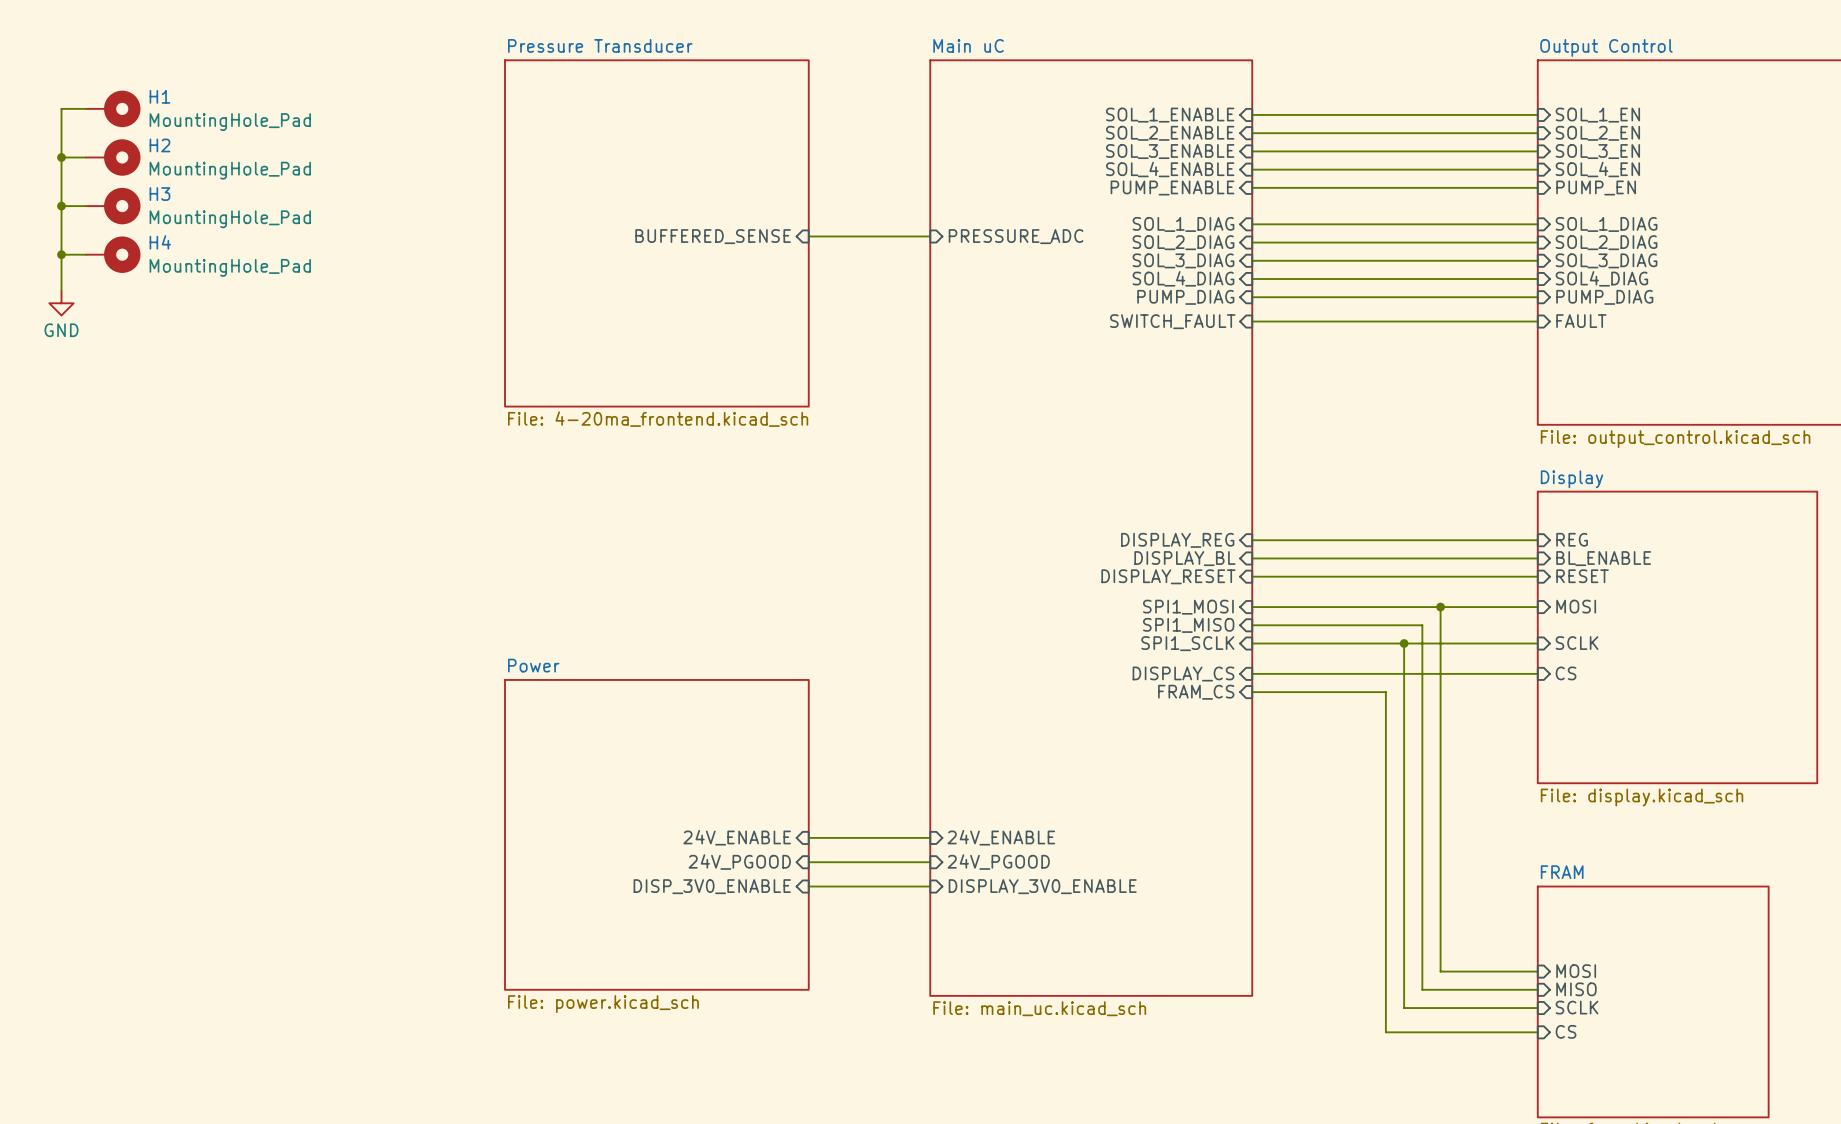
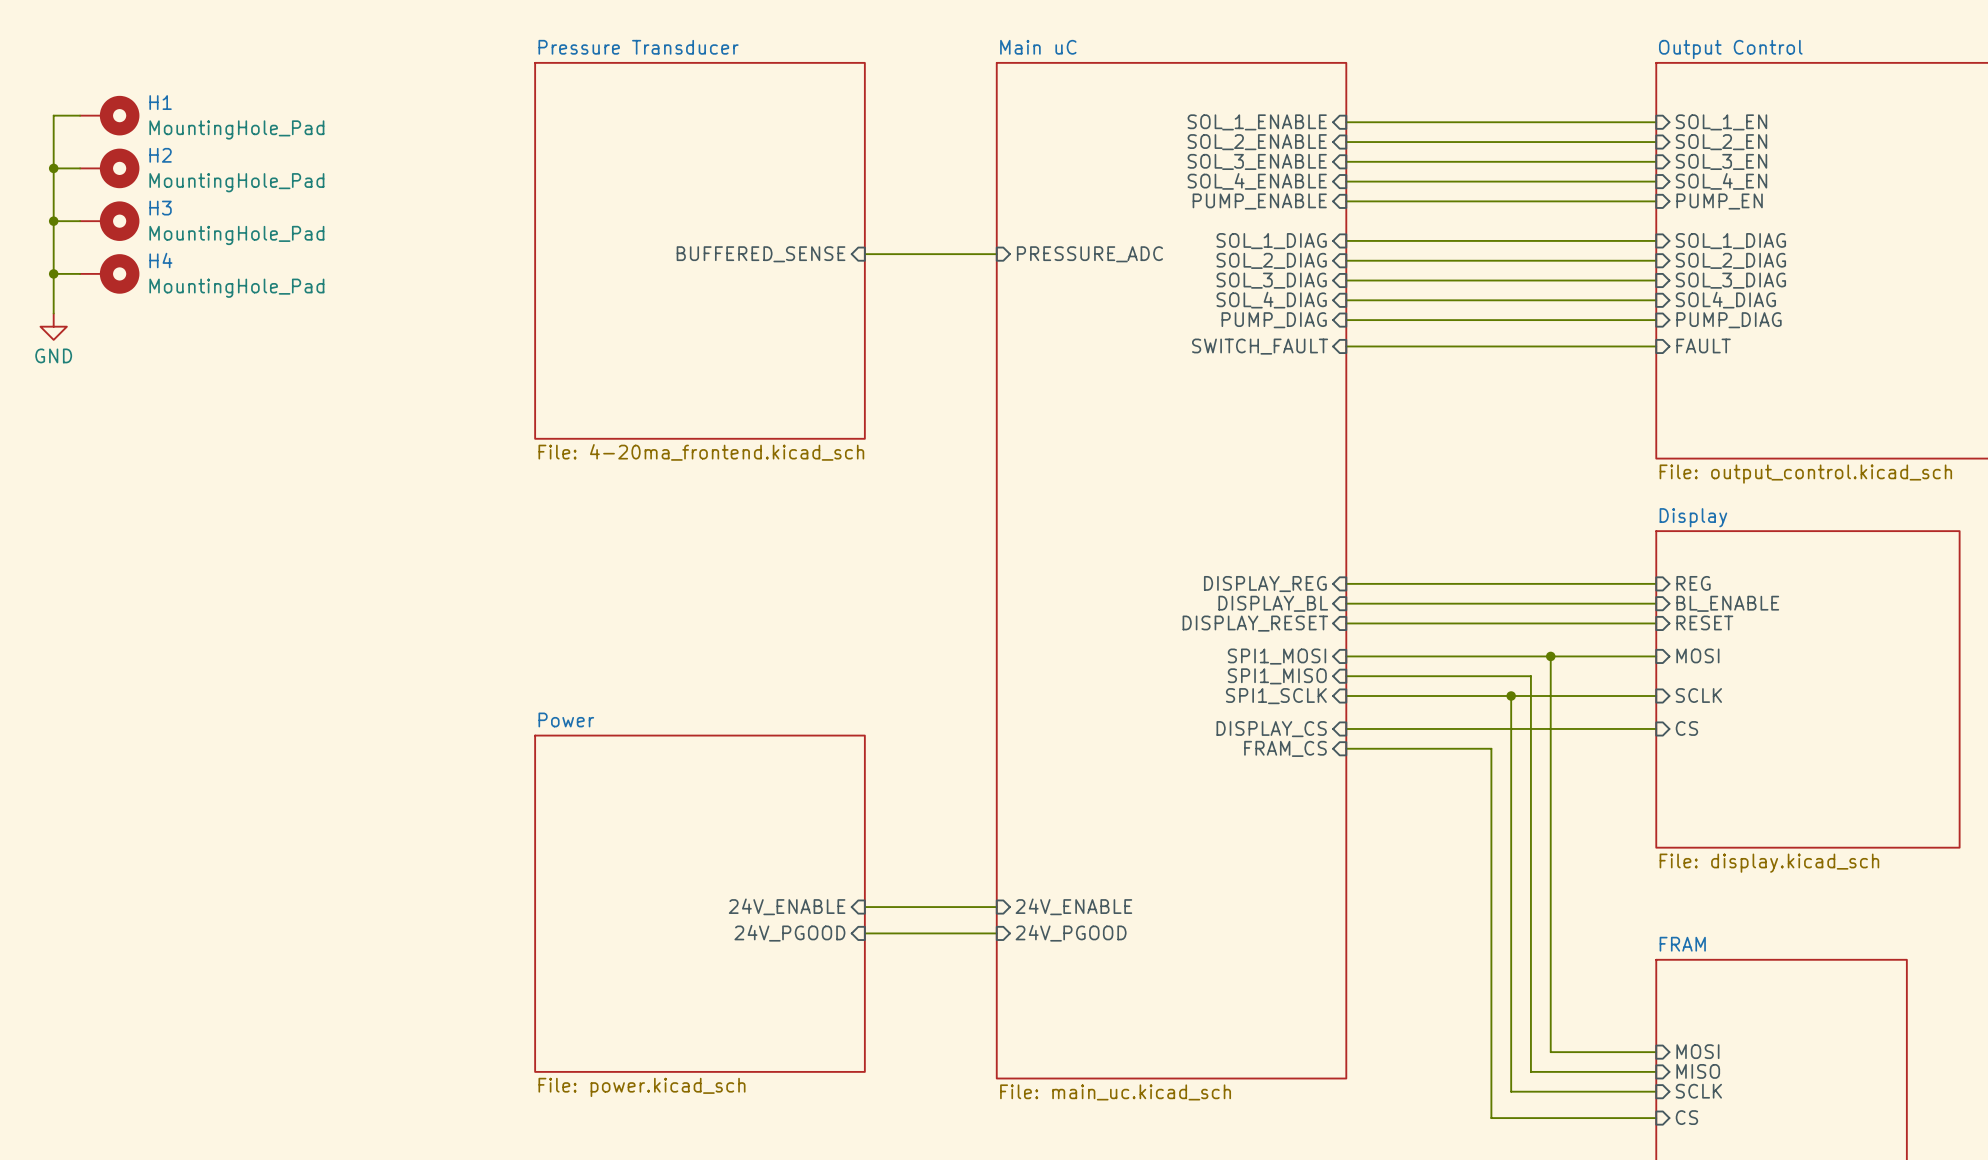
sheet pin: DISP_3V0_ENABLE (712, 886) -> none
wire: (808, 886) (930, 886) -> none
sheet pin: DISPLAY_3V0_ENABLE (1042, 886) -> none

